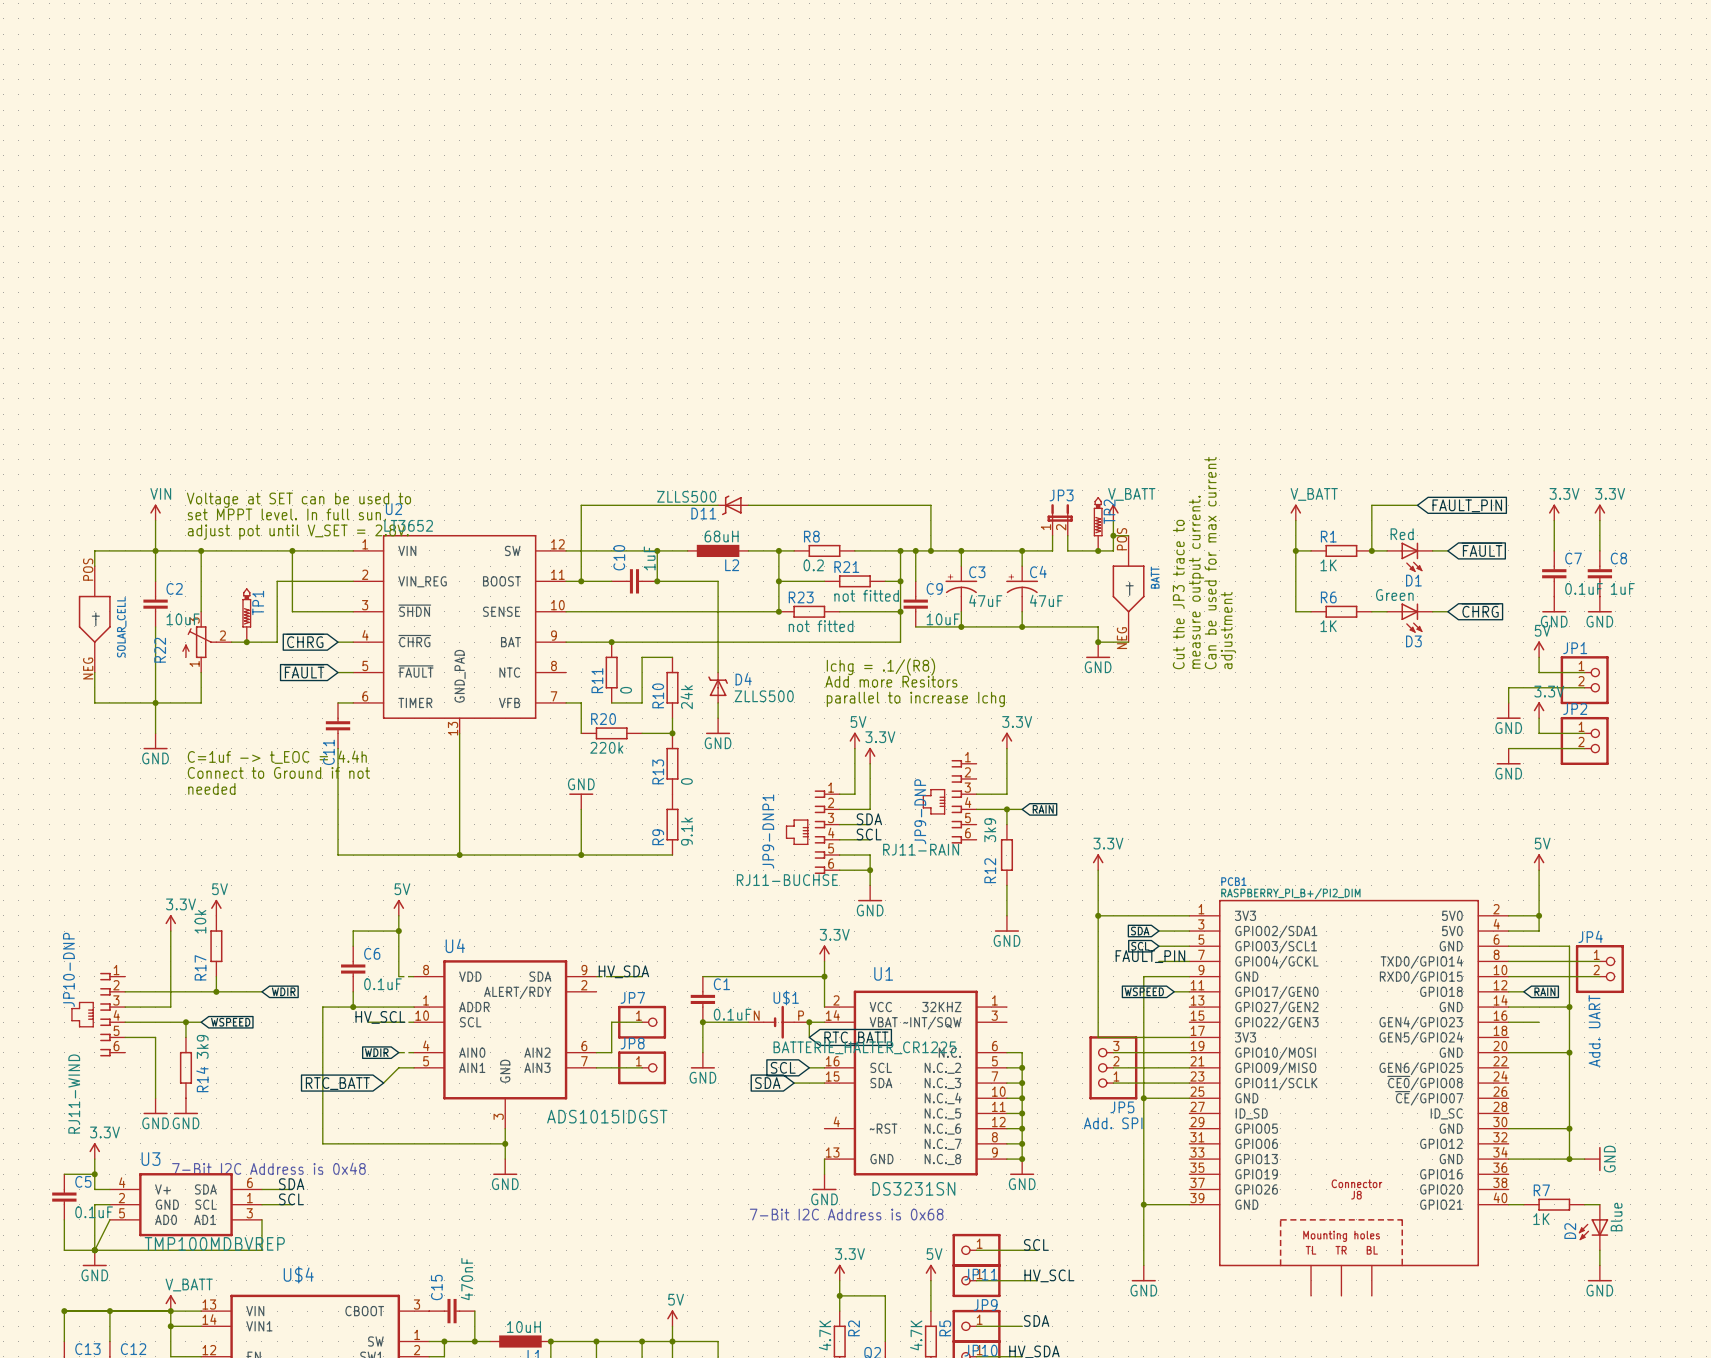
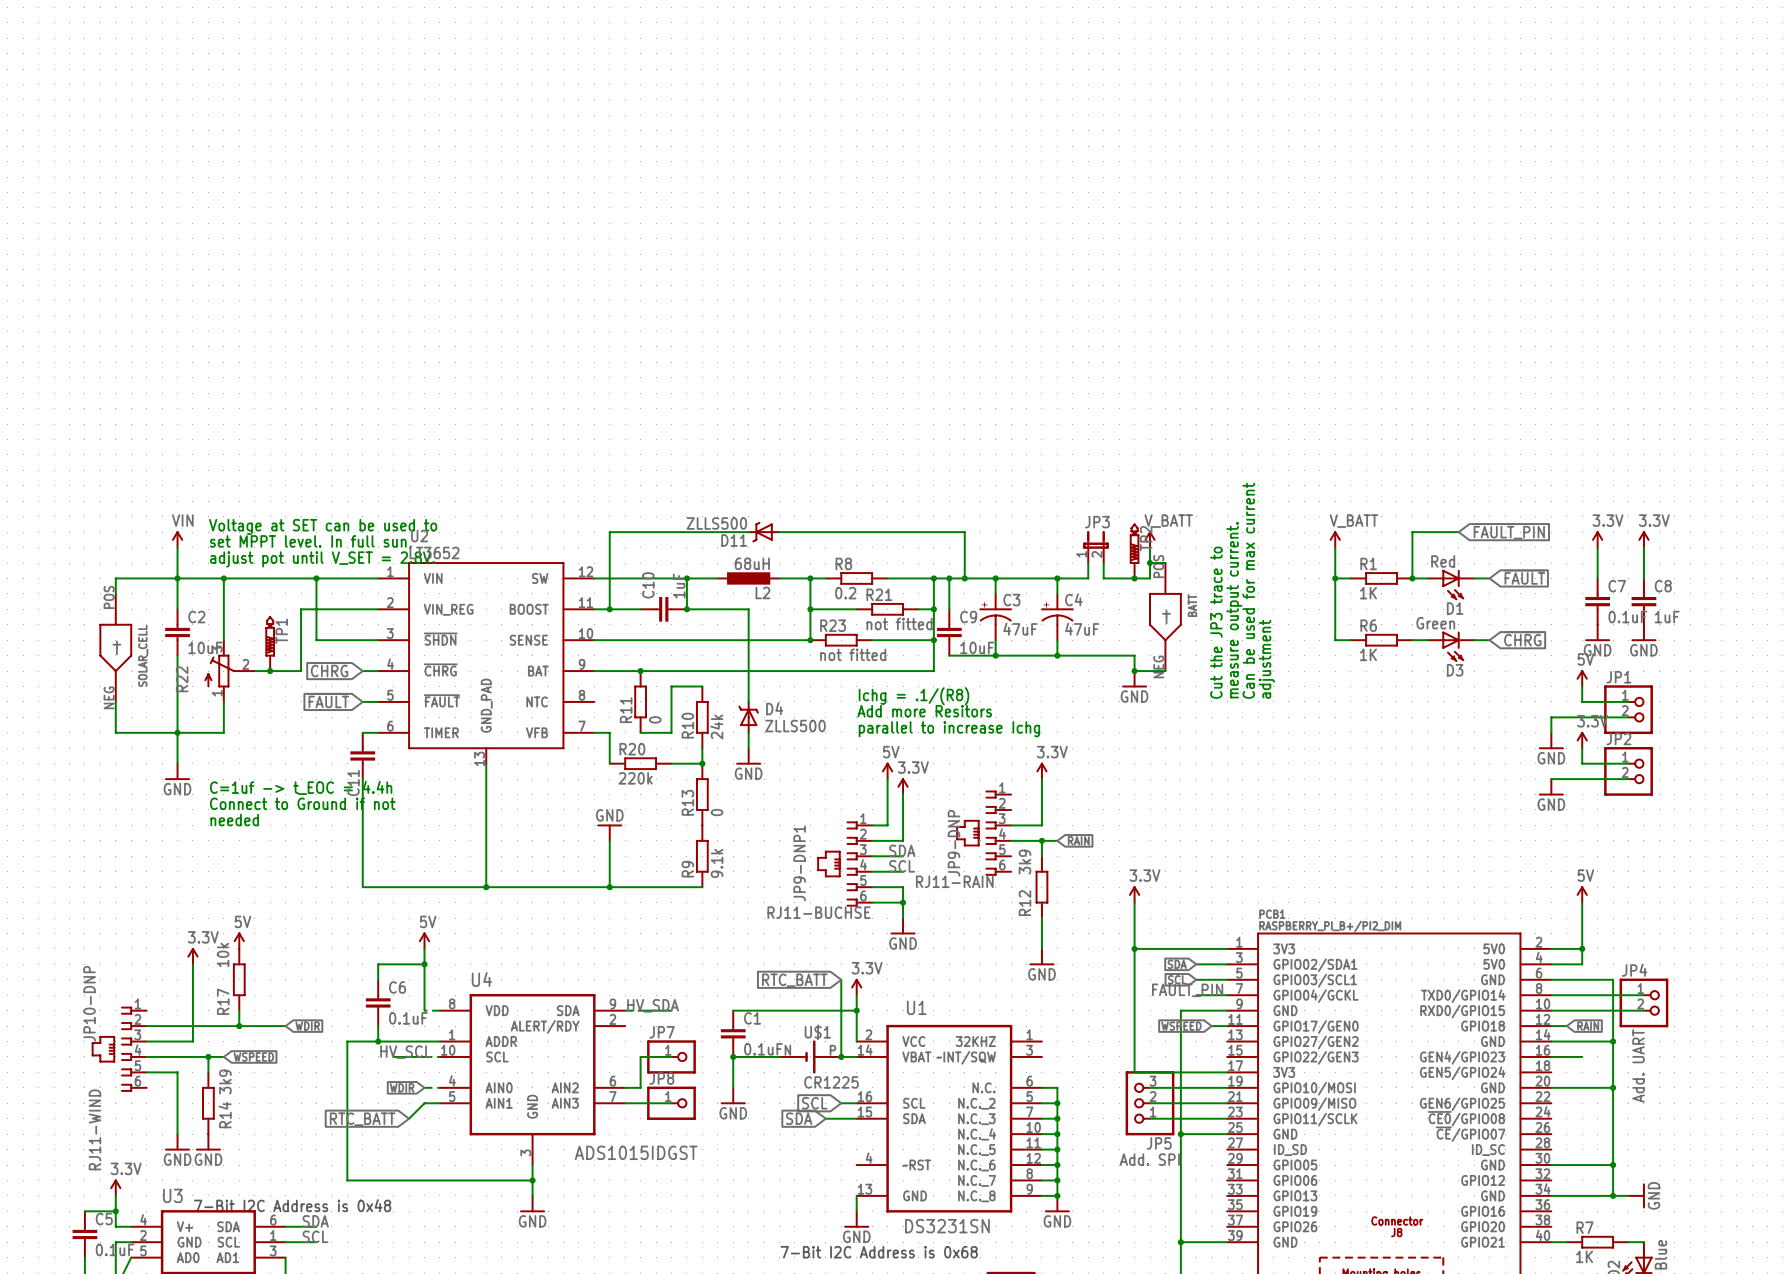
wire: (809, 1022) (809, 1037) -> (841, 1056) (841, 979)
global label rotation: 0° (856, 1037) -> 180° (794, 980)
global label position: RTC_BATT (856, 1037) -> RTC_BATT (794, 980)
U$1 value: BATTERIE_HALTER_CR1225 (864, 1047) -> CR1225 (831, 1082)

